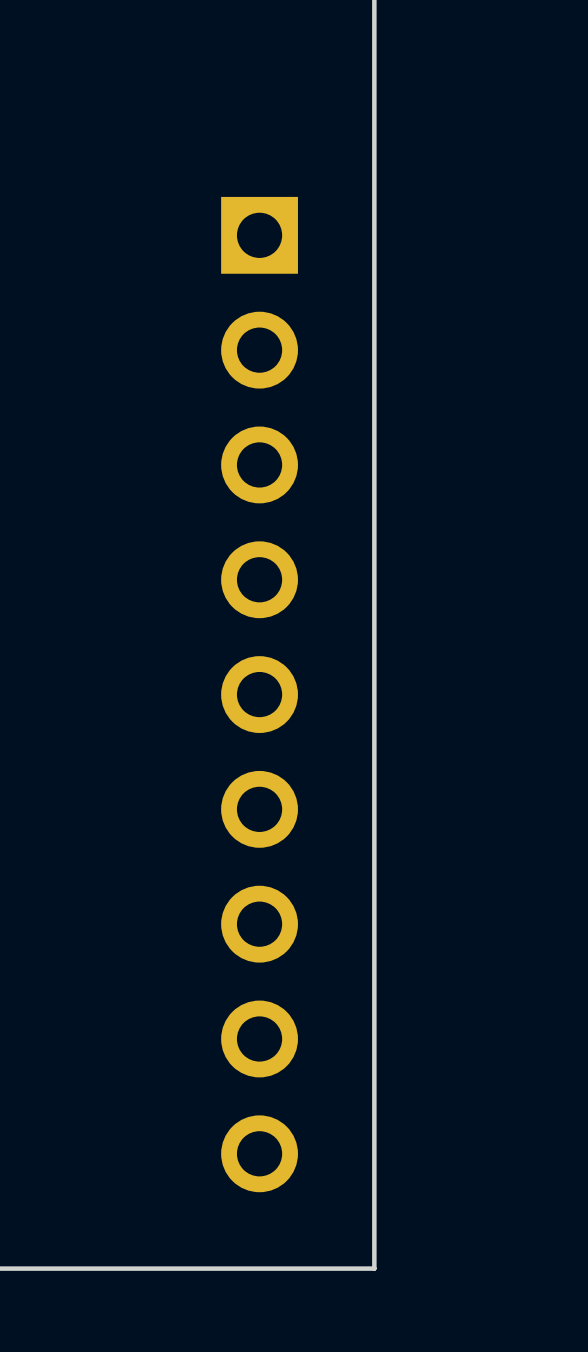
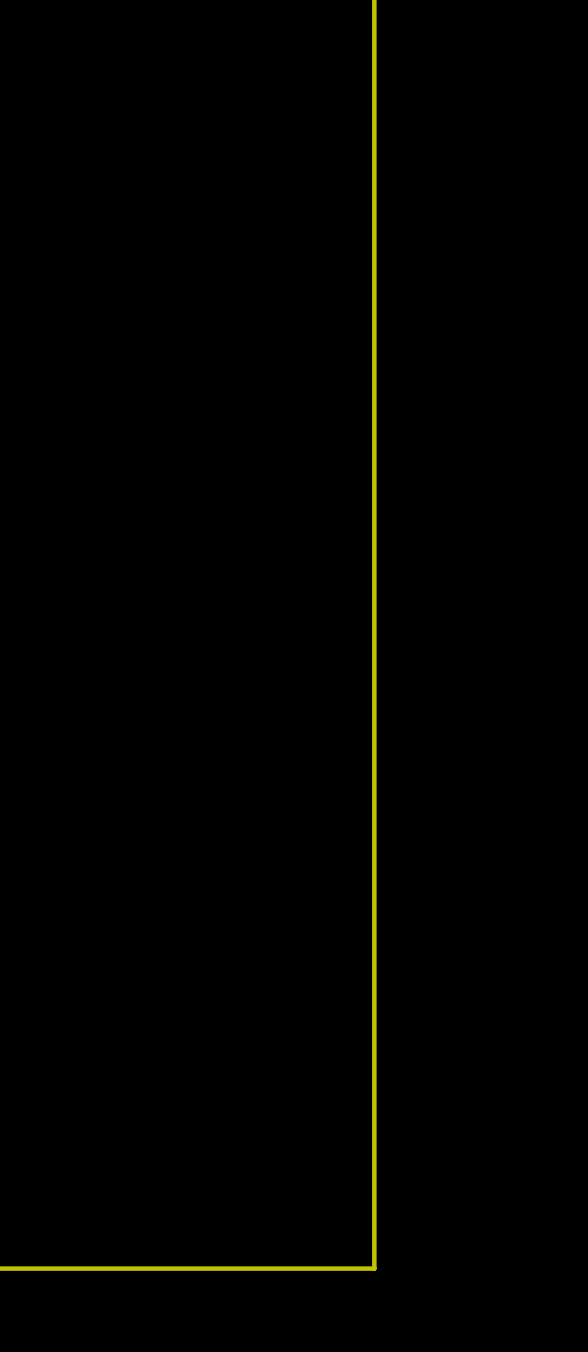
part: (259, 694) -> none

